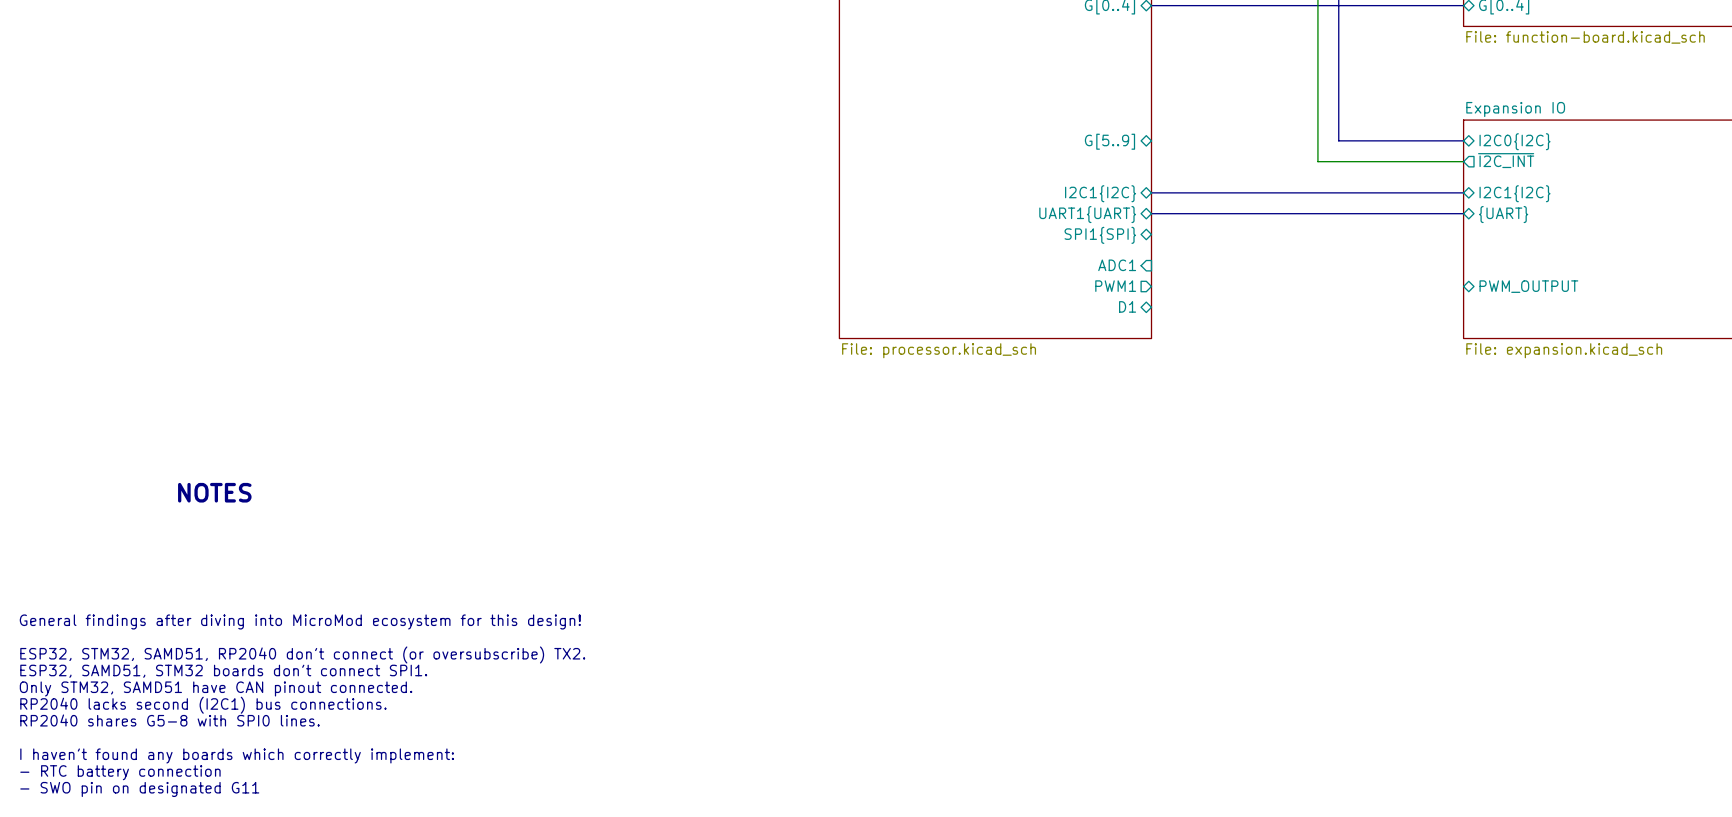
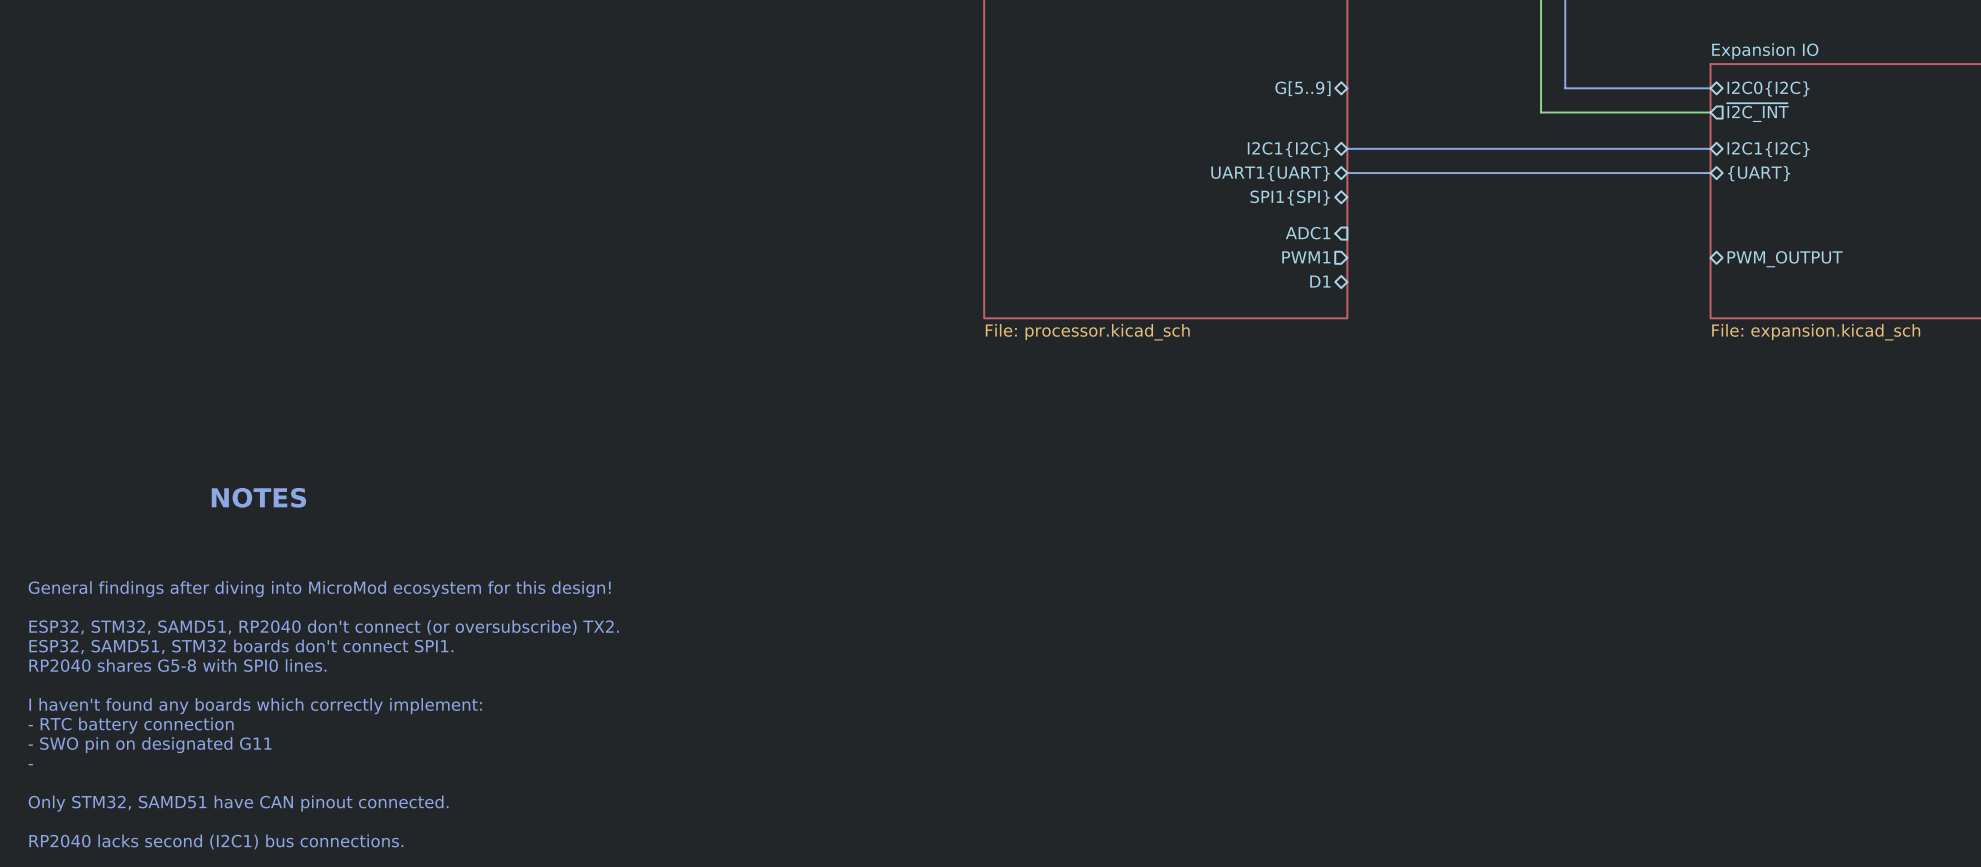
text: none -> General findings after diving into MicroMod ecosystem for this design! (319, 589)
text: General findings after diving into MicroMod ecosystem for this design! (300, 621) -> ESP32, SAMD51, STM32 boards don't connect SPI1. (241, 646)
text: none -> RP2040 shares G5-8 with SPI0 lines. (177, 665)
text position: ESP32, STM32, SAMD51, RP2040 don't connect (or oversubscribe) TX2. (302, 654) -> ESP32, STM32, SAMD51, RP2040 don't connect (or oversubscribe) TX2. (324, 627)
text: ESP32, SAMD51, STM32 boards don't connect SPI1. (223, 671) -> I haven't found any boards which correctly implement: (255, 706)
text: Only STM32, SAMD51 have CAN pinout connected. (216, 688) -> - RTC battery connection (131, 725)
text: RP2040 lacks second (I2C1) bus connections. (203, 705) -> - SWO pin on designated G11 (150, 745)
text: RP2040 shares G5-8 with SPI0 lines. (169, 720) -> - (30, 764)
text: I haven't found any boards which correctly implement: (237, 755) -> Only STM32, SAMD51 have CAN pinout connected. (238, 803)
text: - RTC battery connection (120, 772) -> none
text: - SWO pin on designated G11 (139, 789) -> RP2040 lacks second (I2C1) bus connections. (216, 841)

